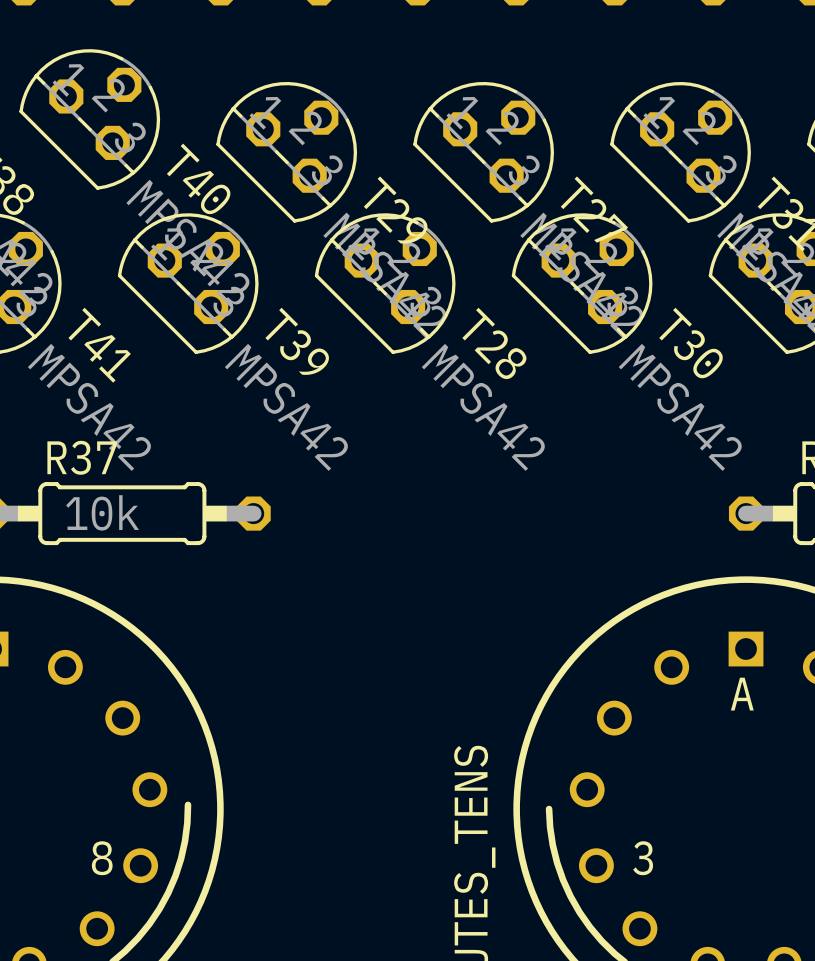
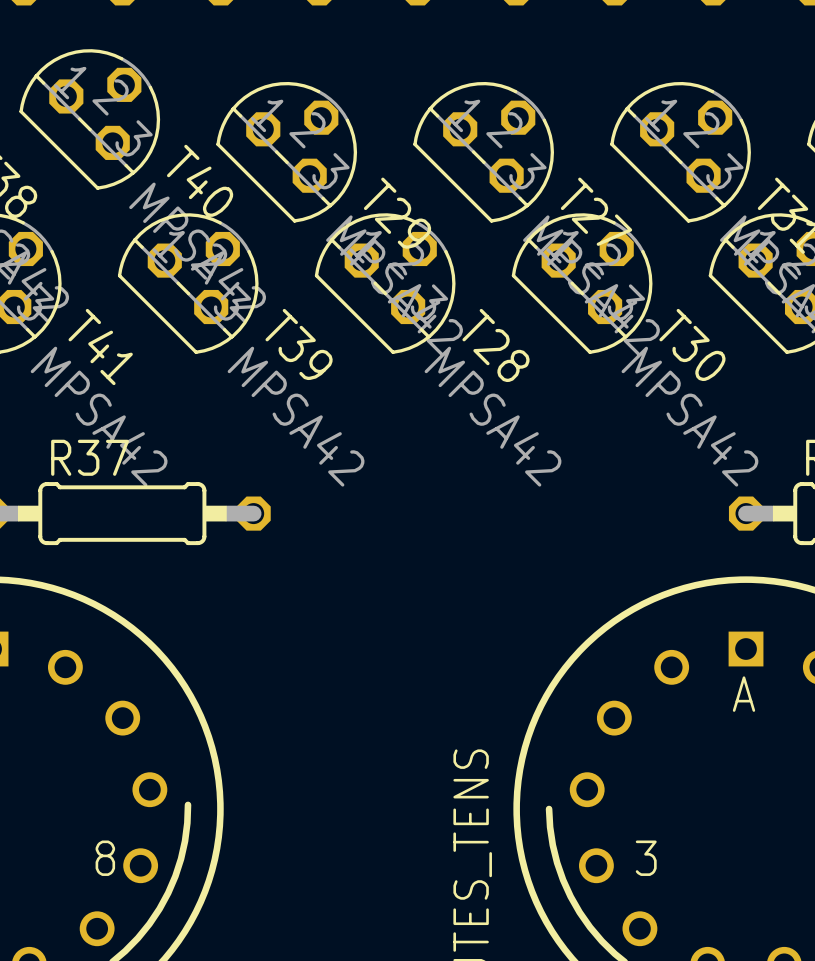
R37 value: 10k (102, 512) -> none

